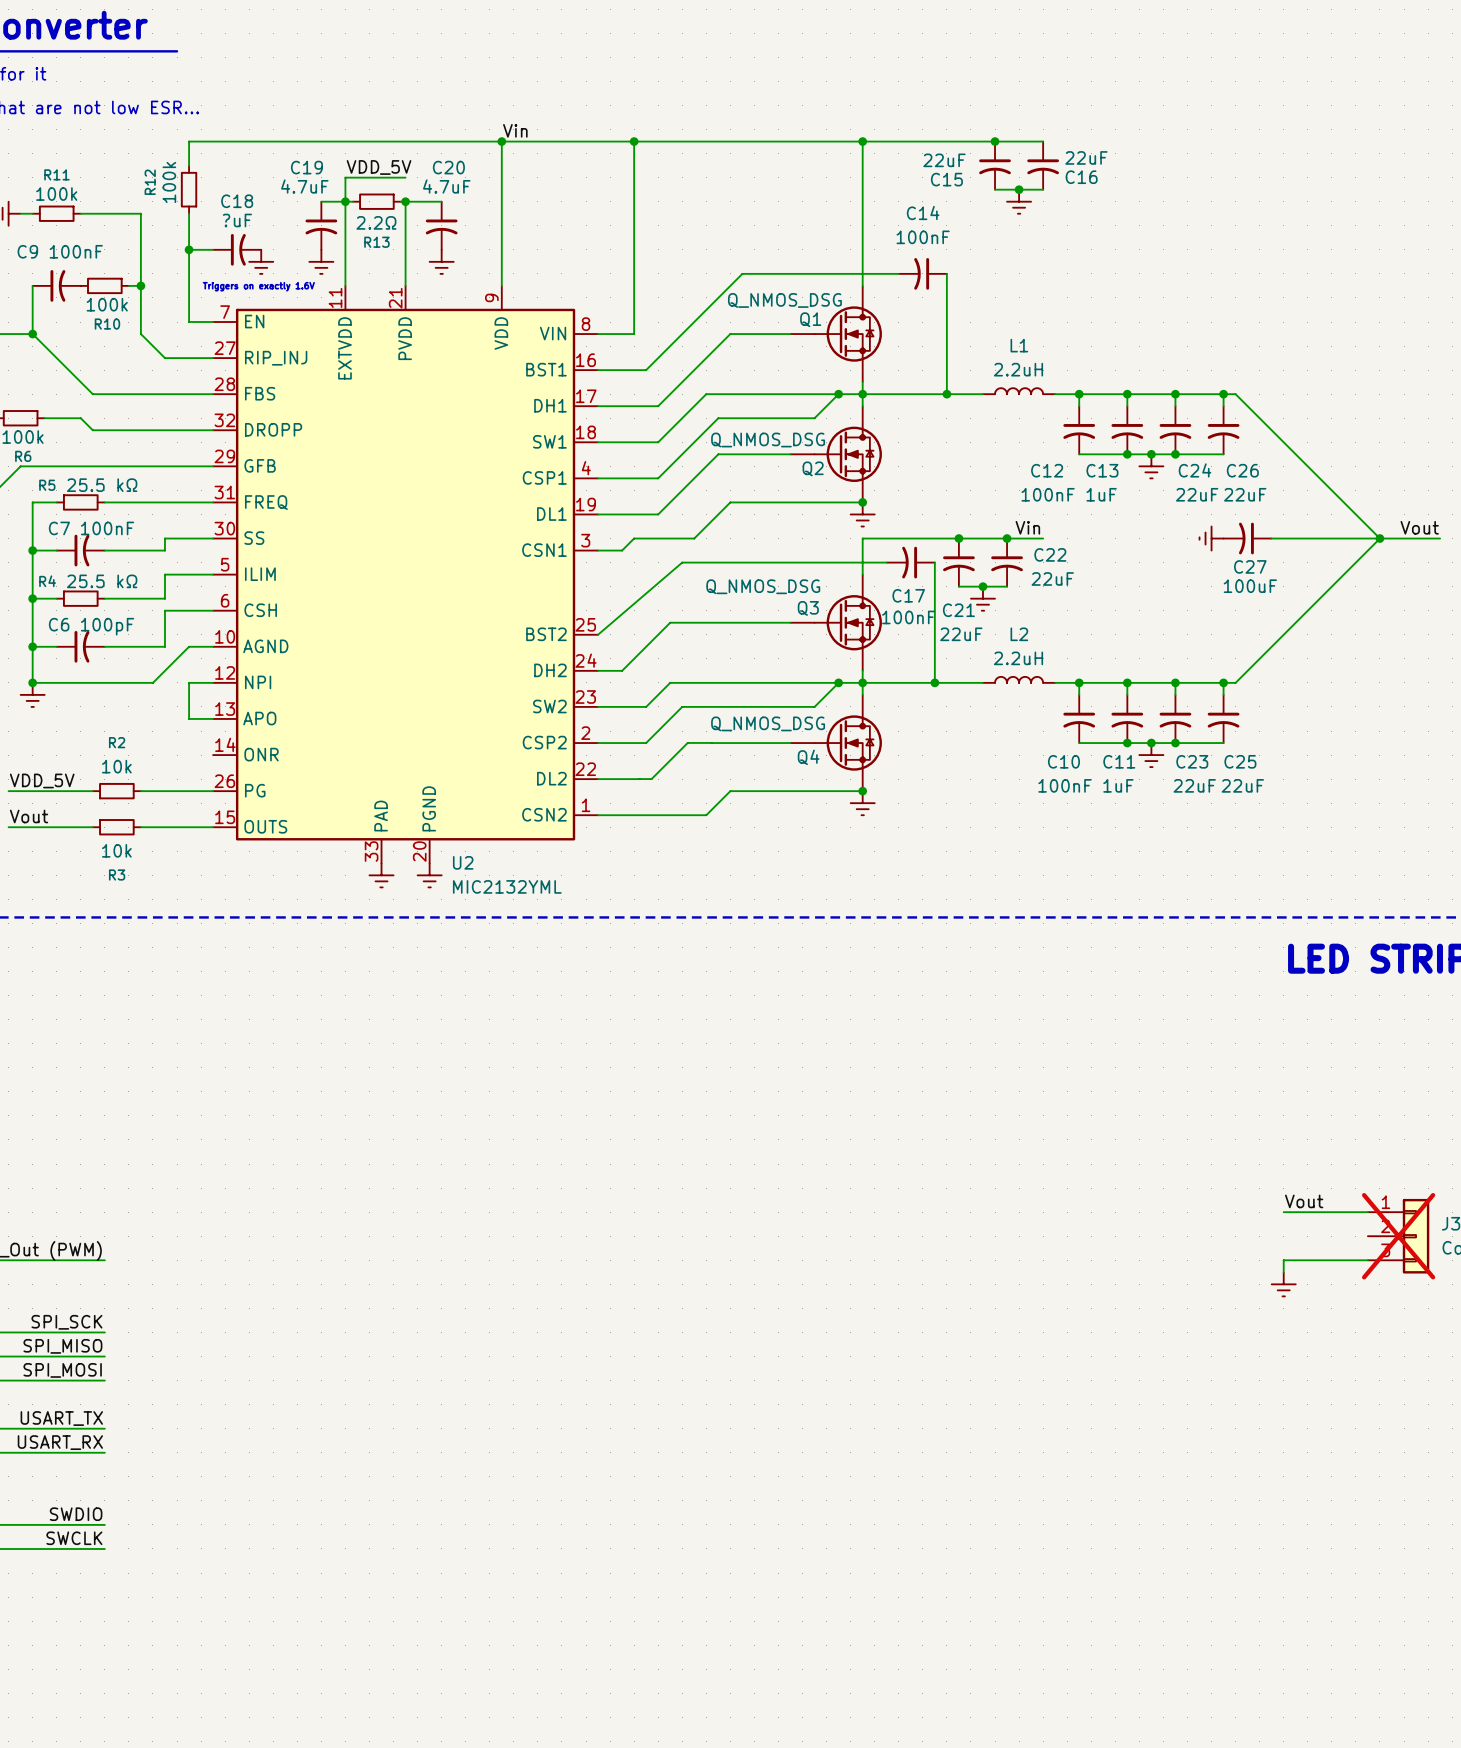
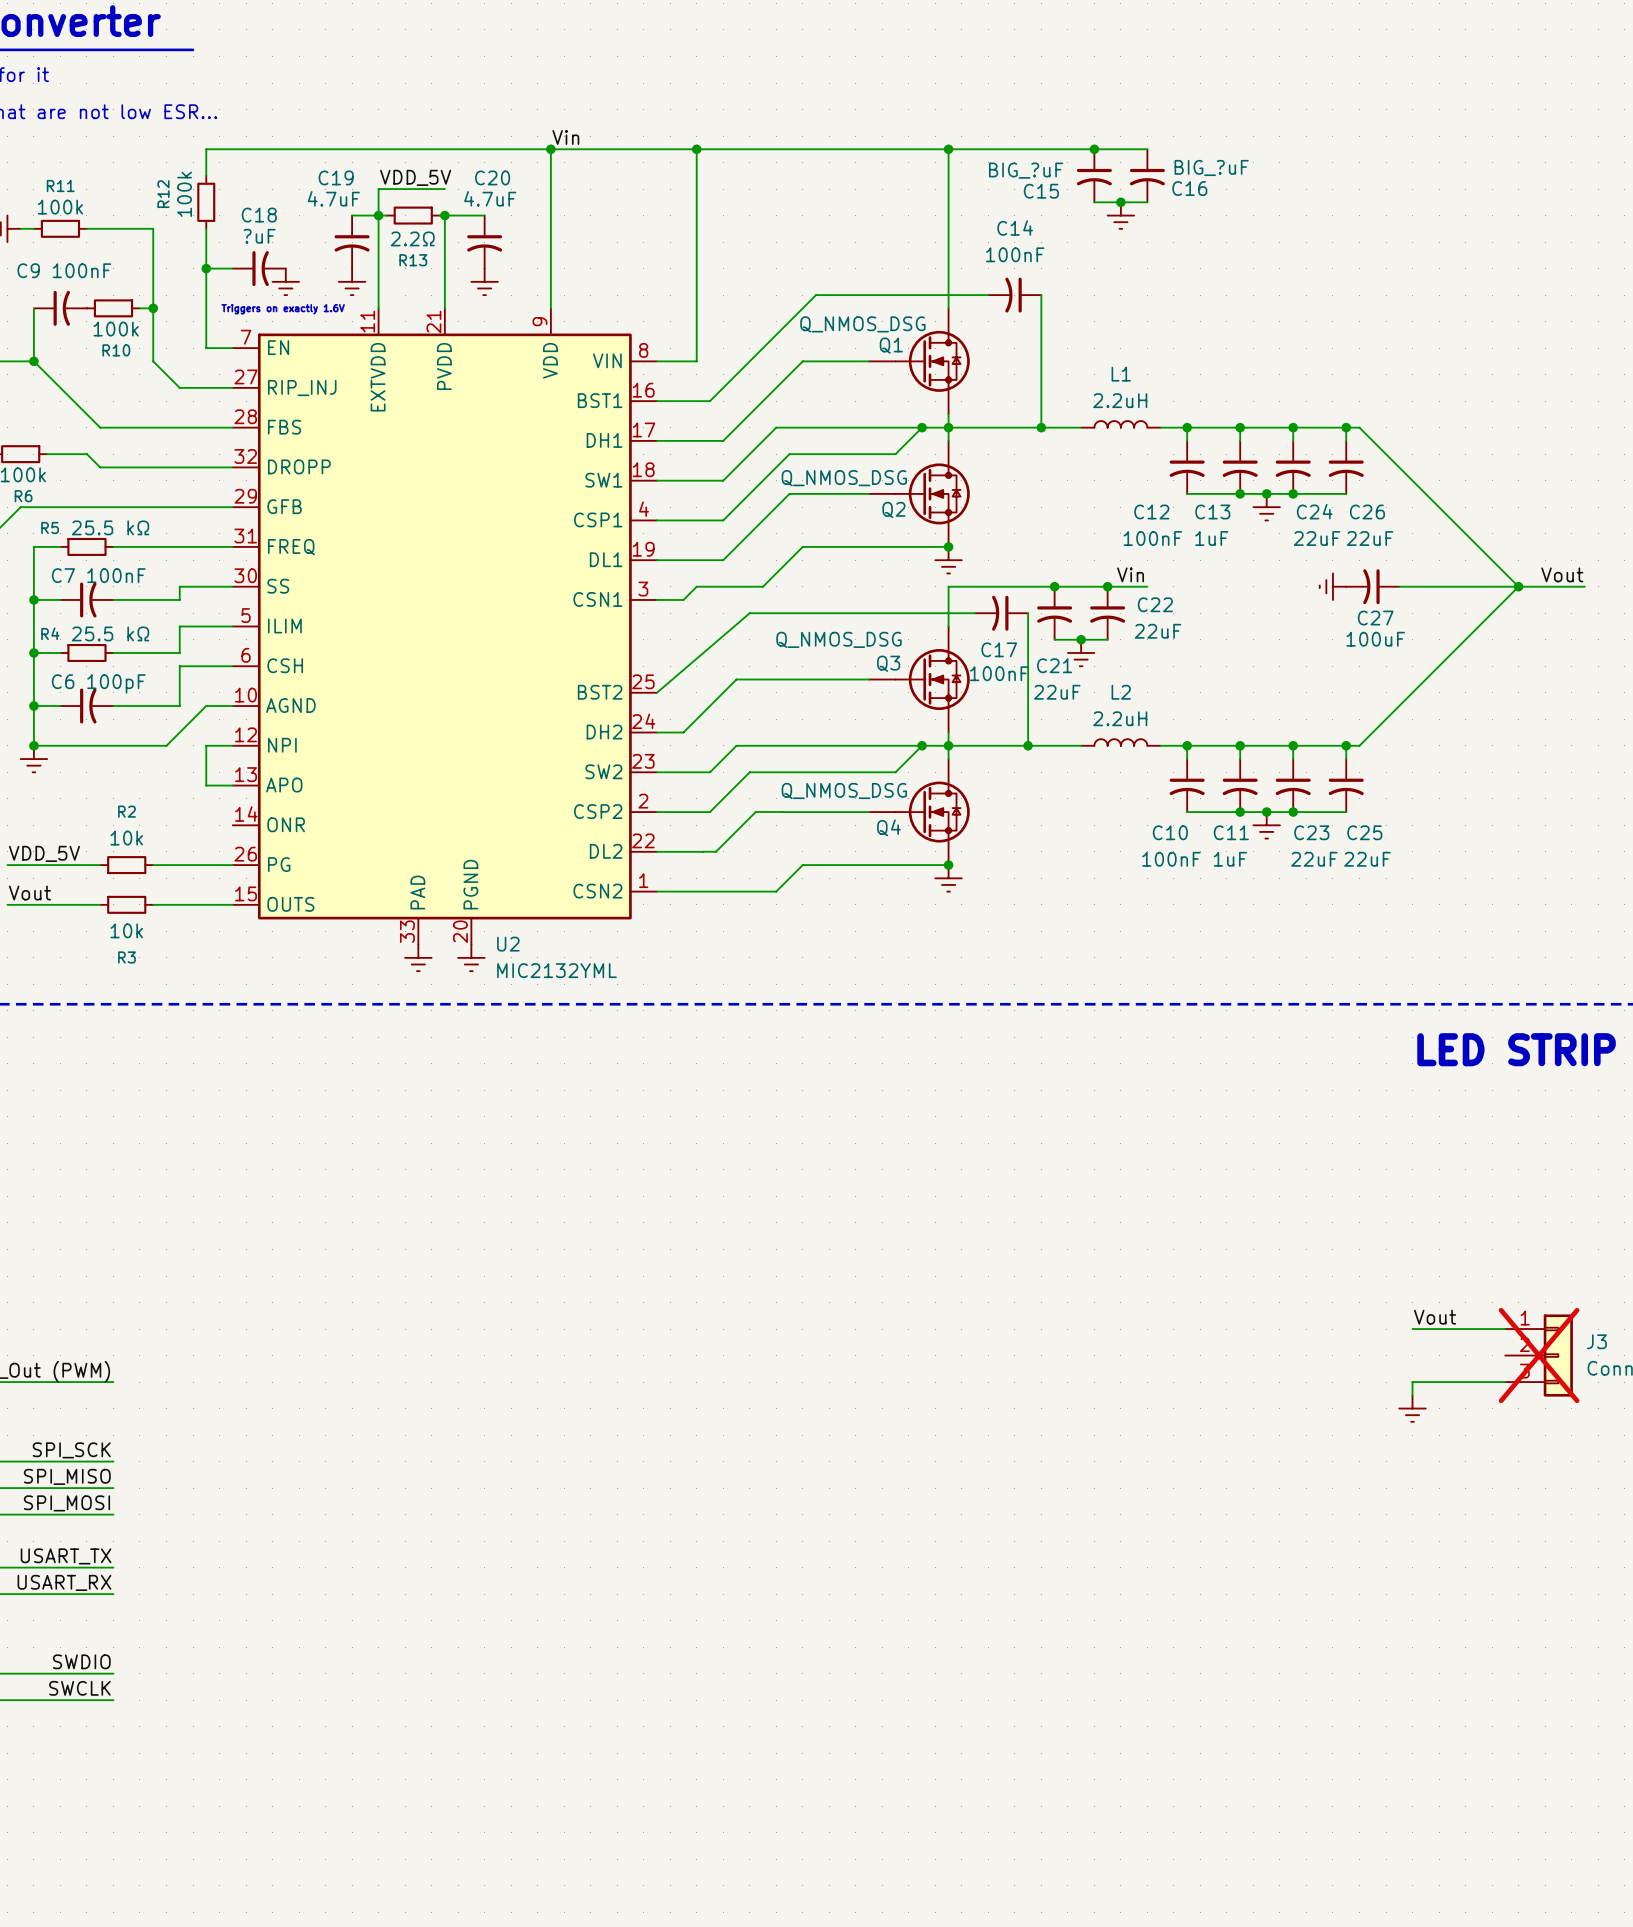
C16 value: 22uF (1086, 157) -> BIG_?uF (1211, 167)
C15 value: 22uF (944, 160) -> BIG_?uF (1026, 170)

